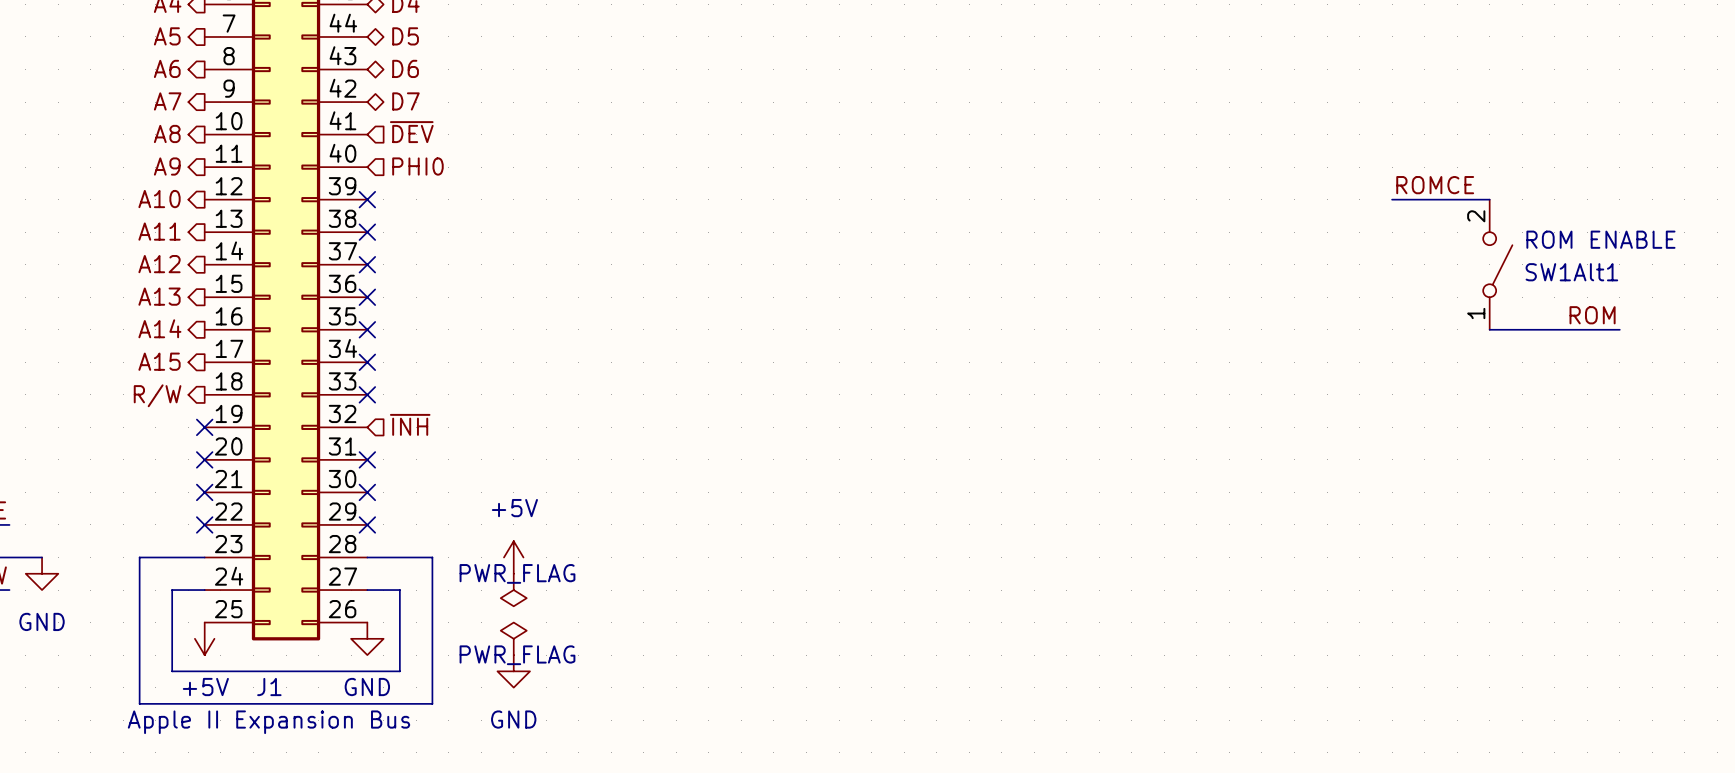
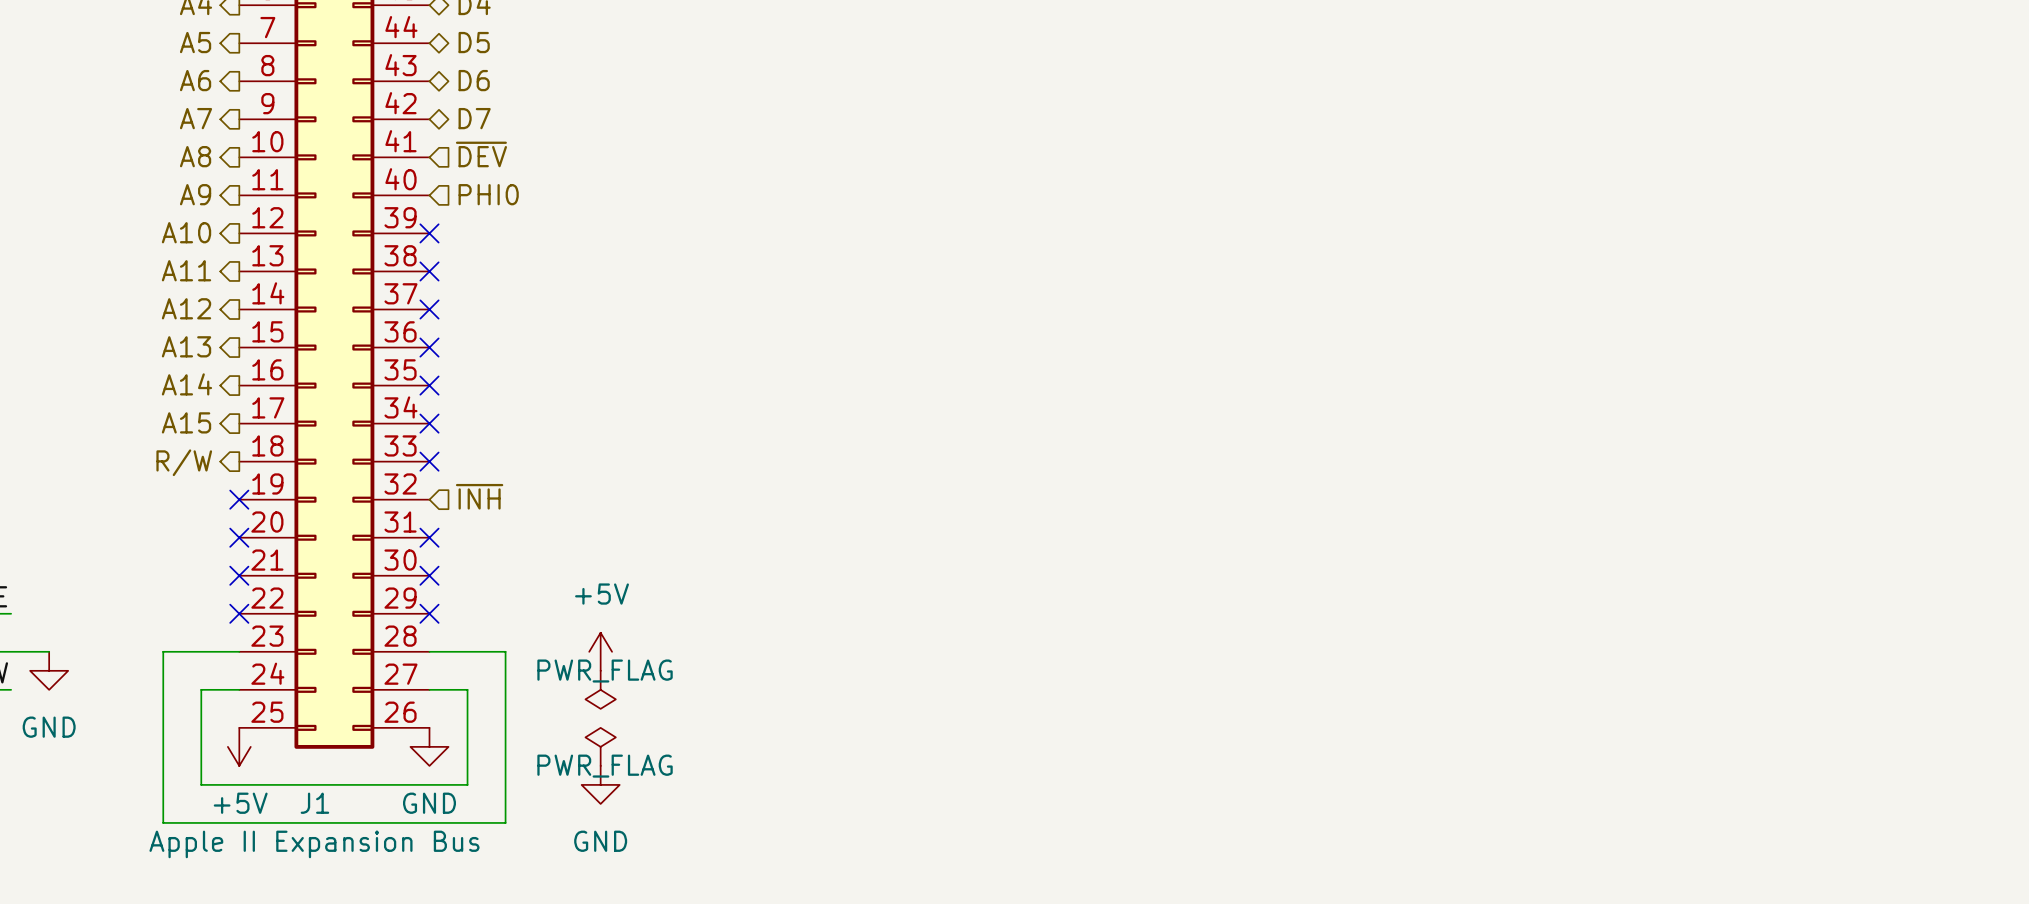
label: ROMCE (1435, 185) -> none
wire: (1392, 199) (1489, 199) -> none
SW1Alt1: ROM ENABLE (1497, 264) -> none
label: ROM (1592, 315) -> none
wire: (1489, 329) (1619, 329) -> none

